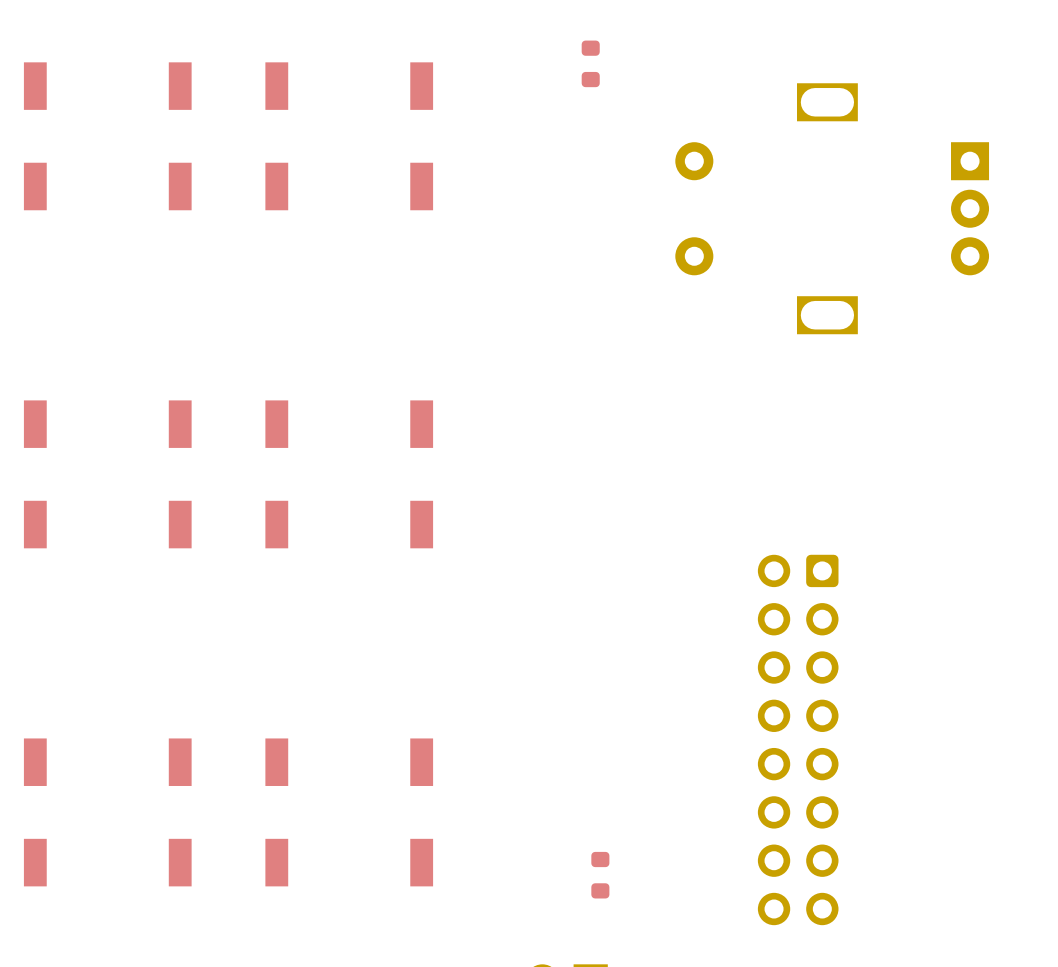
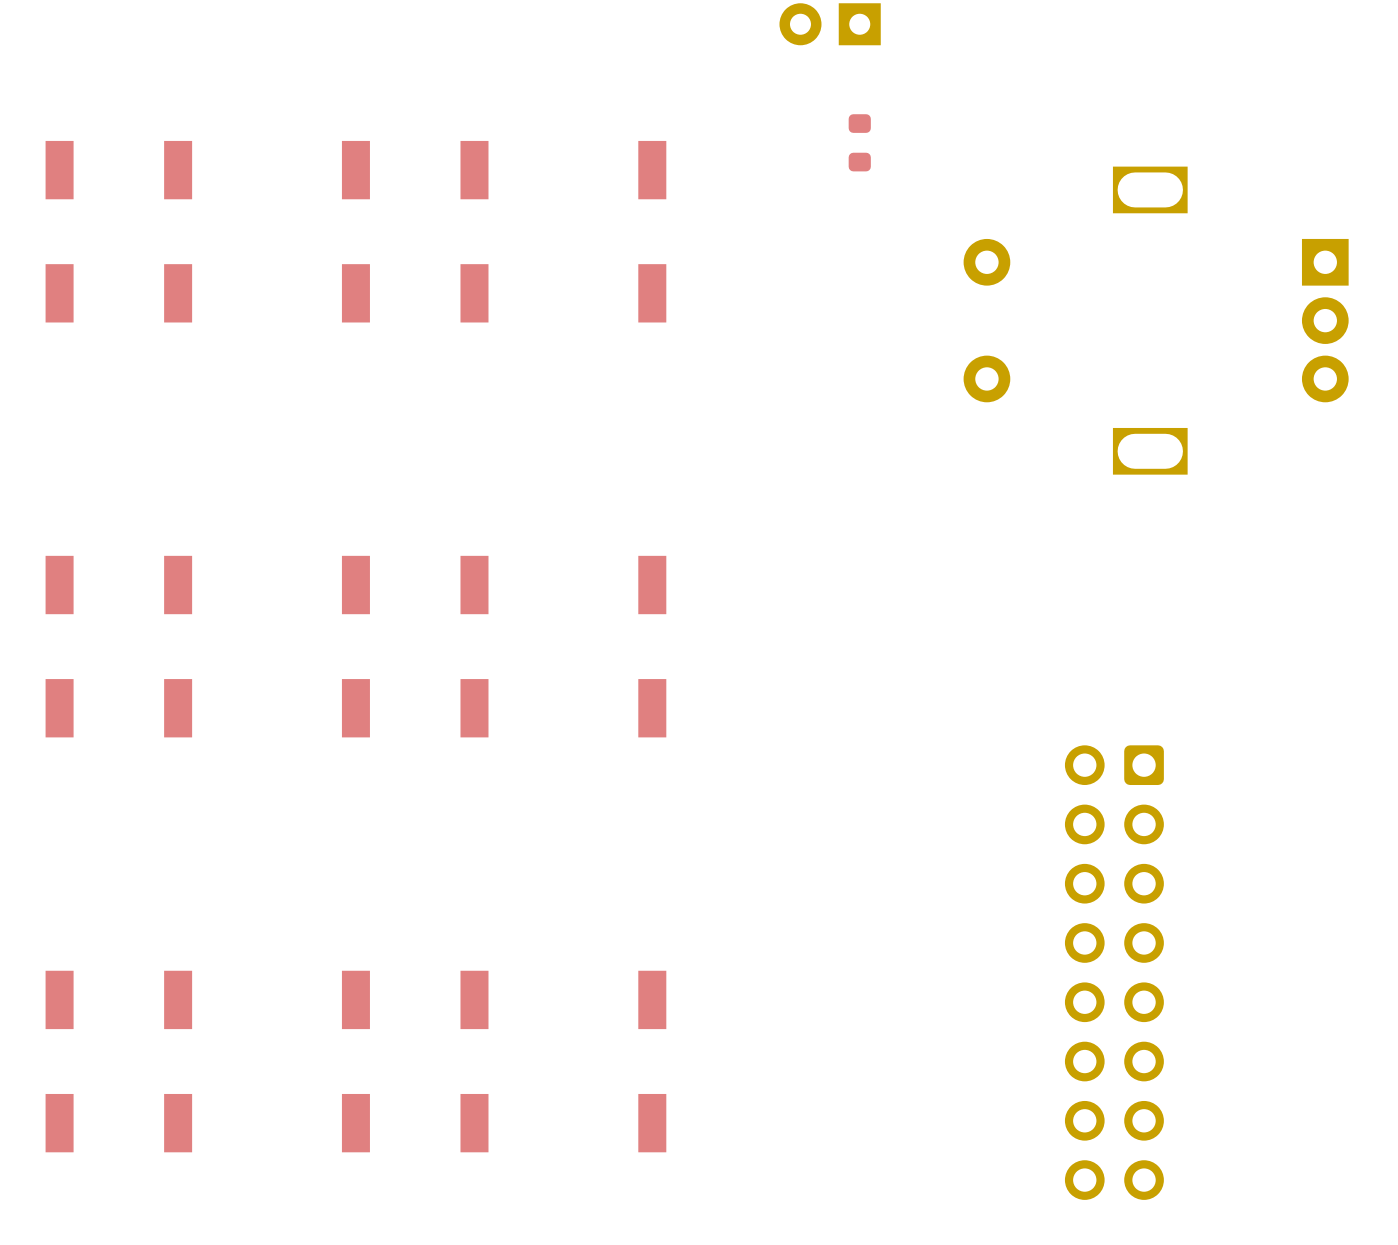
part: (600, 875) -> none

